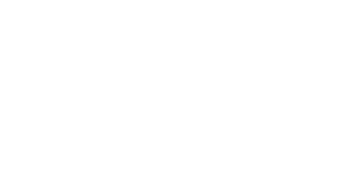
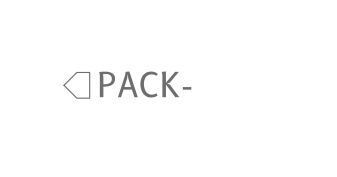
hierarchical label: none -> PACK- (145, 84)

